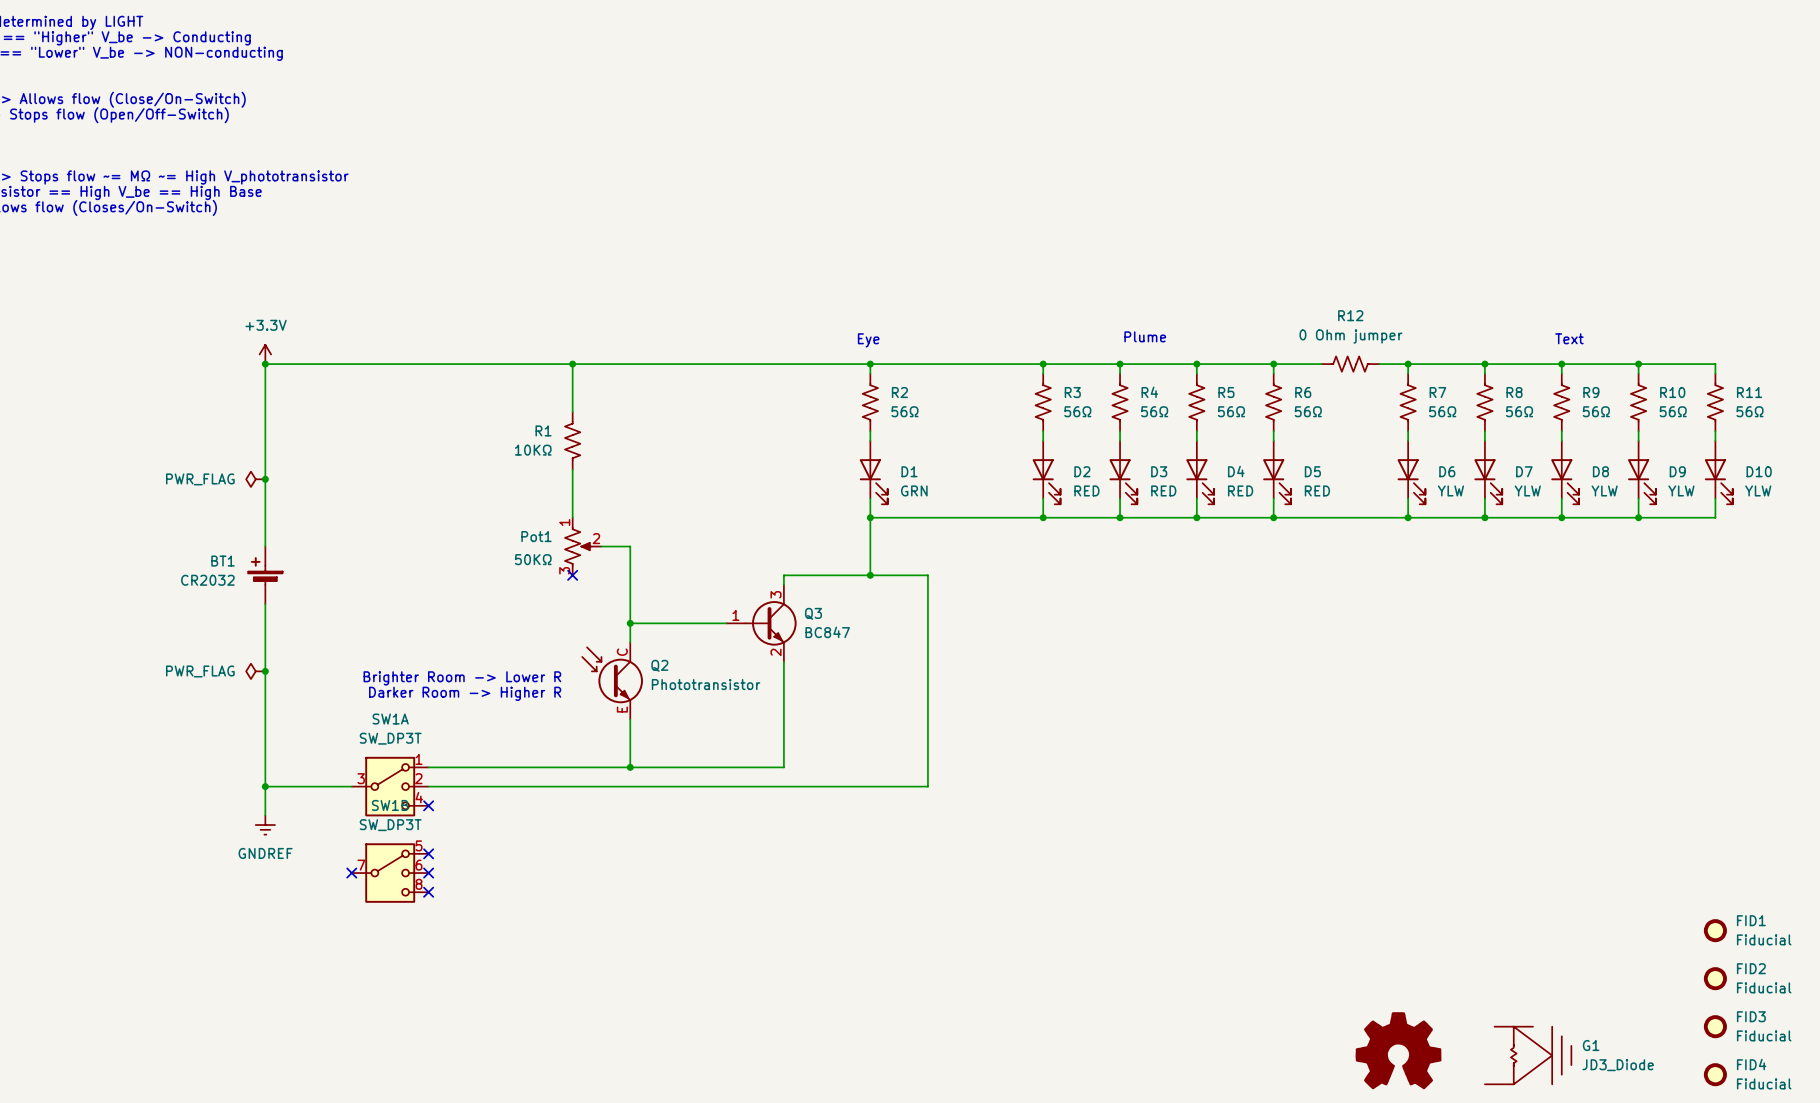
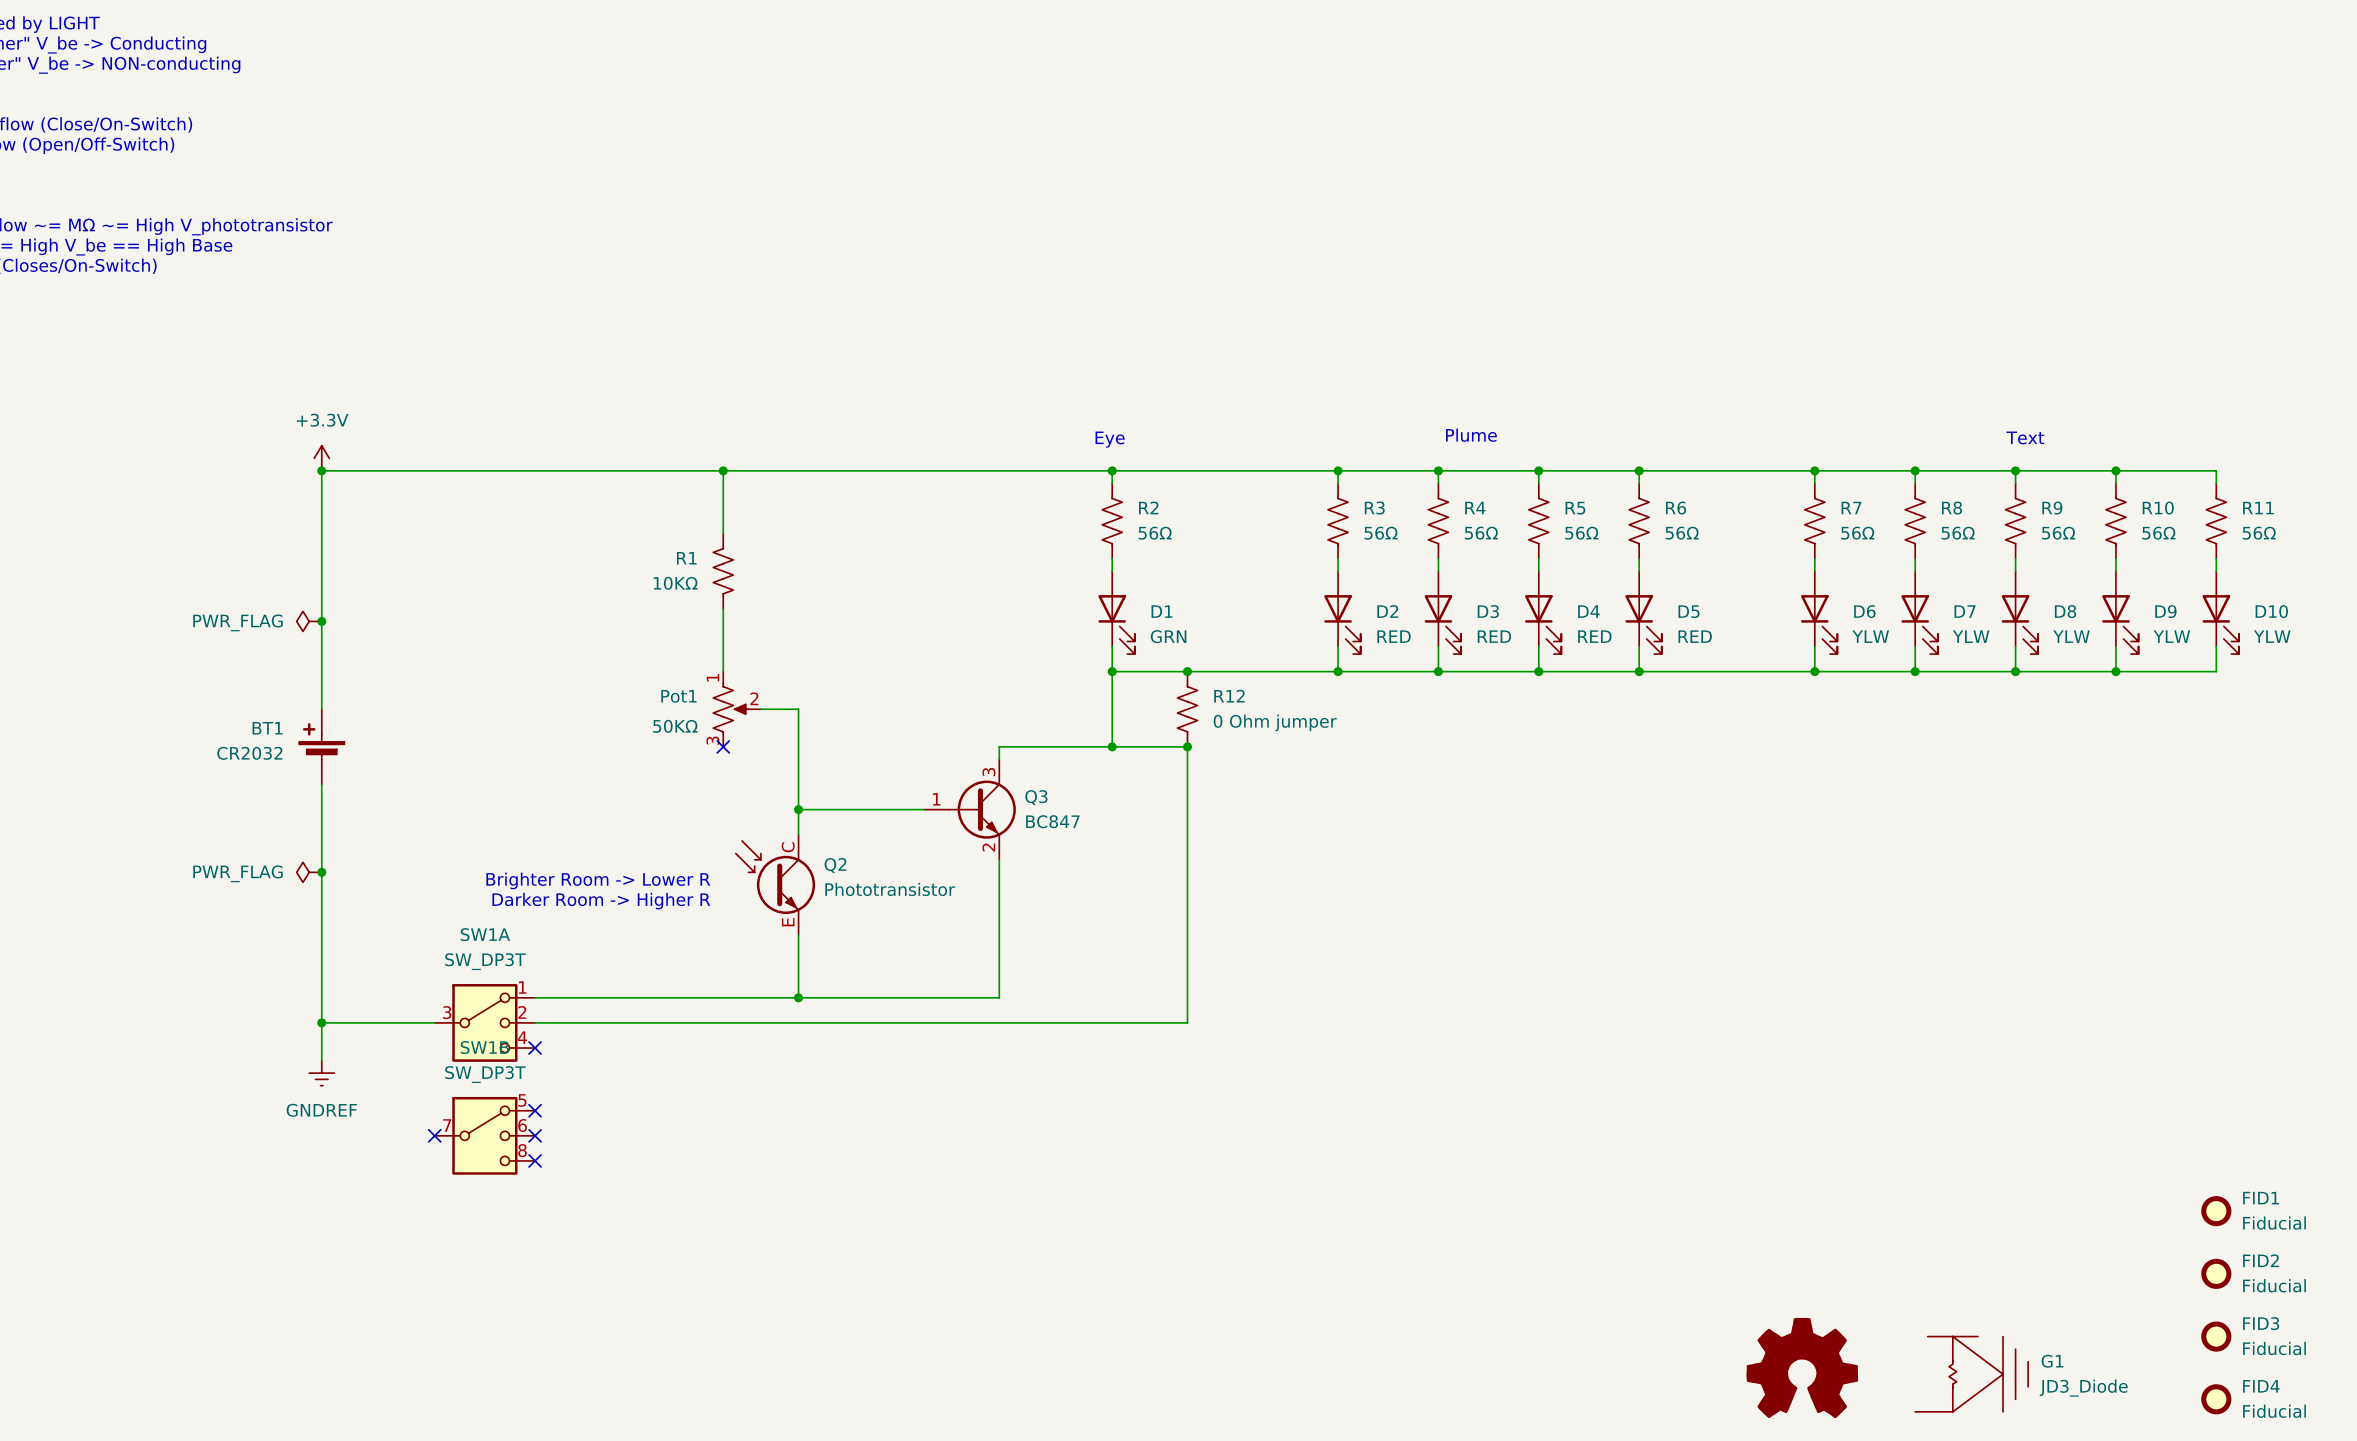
R12 name position: R12 (1350, 315) -> R12 (1229, 696)
R12 value position: 0 Ohm jumper (1350, 336) -> 0 Ohm jumper (1275, 722)
R12 rotation: 0° (1350, 364) -> 90° clockwise (1187, 709)
R12 position: (1350, 364) -> (1187, 709)
junction: none -> (1187, 671)
junction: none -> (1187, 746)

